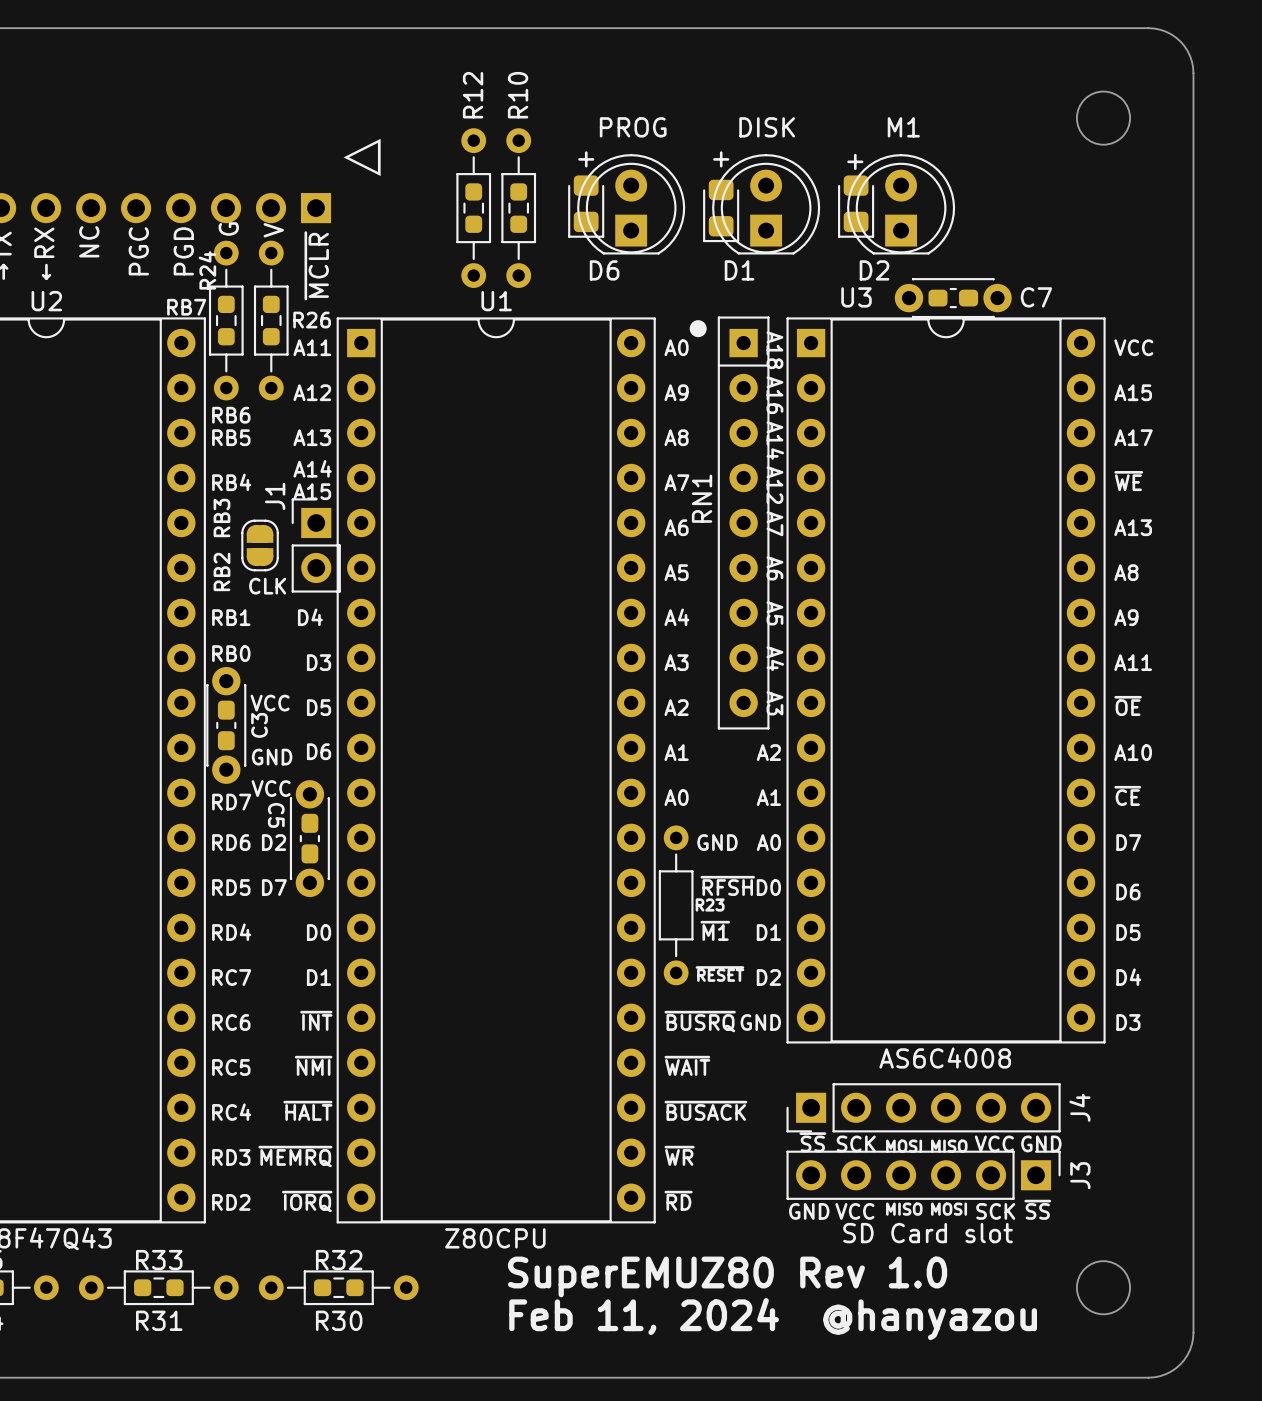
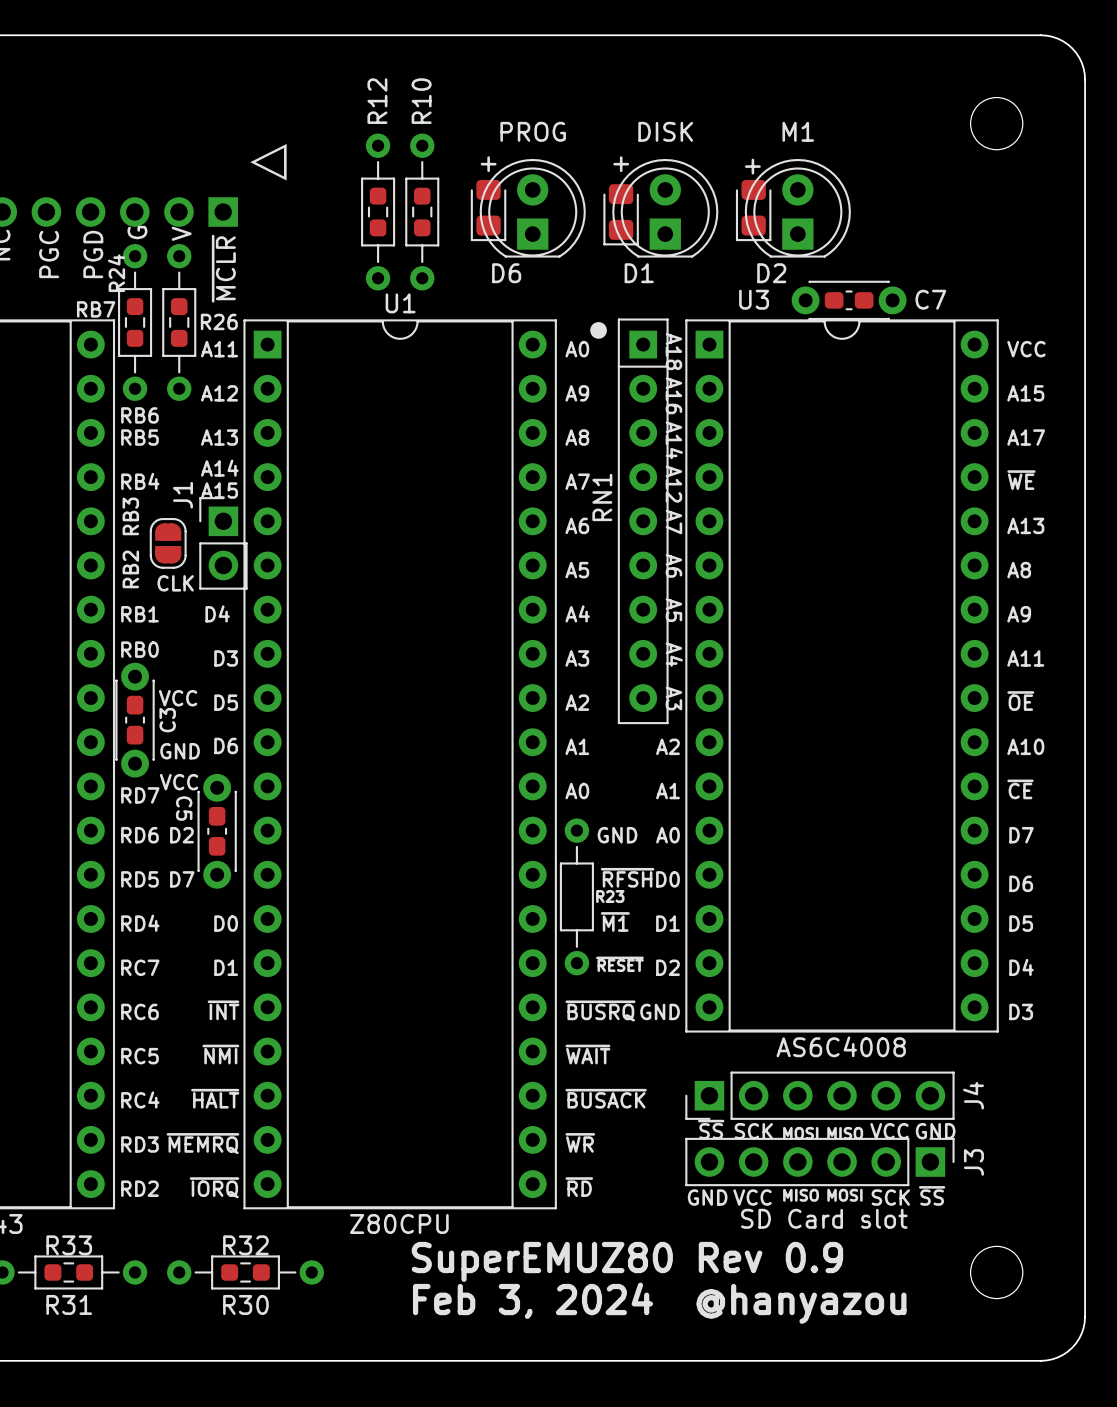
D6 value: none -> PROG (533, 131)
D1 value: none -> DISK (665, 131)
D2 value: none -> M1 (798, 131)
text: PROG (633, 127) -> none
text: DISK (767, 127) -> none
text: M1 (903, 127) -> none
text: SuperEMUZ80 Rev 1.0 (727, 1276) -> SuperEMUZ80 Rev 0.9 (627, 1261)
text: Feb 11, 2024 @hanyazou (773, 1319) -> Feb 3, 2024 @hanyazou (659, 1303)

